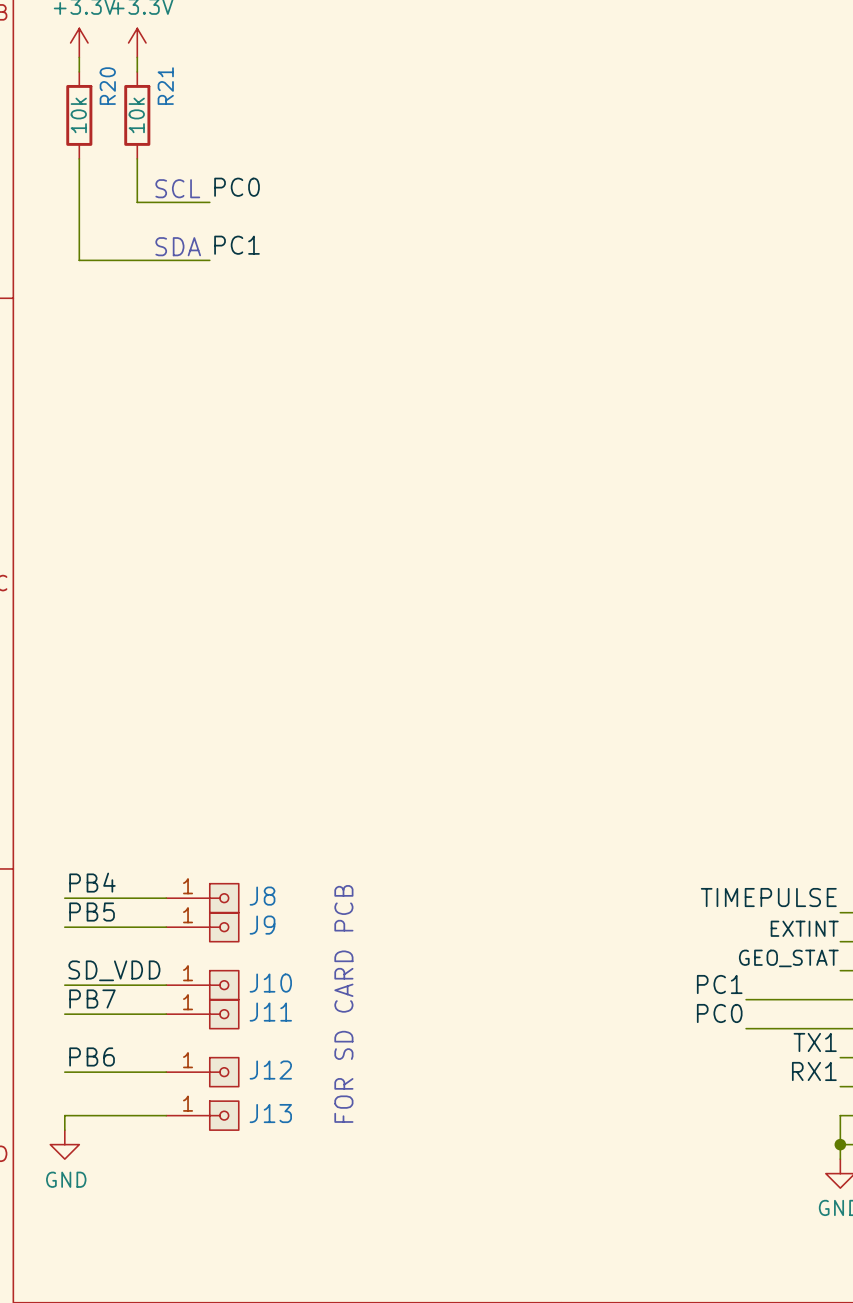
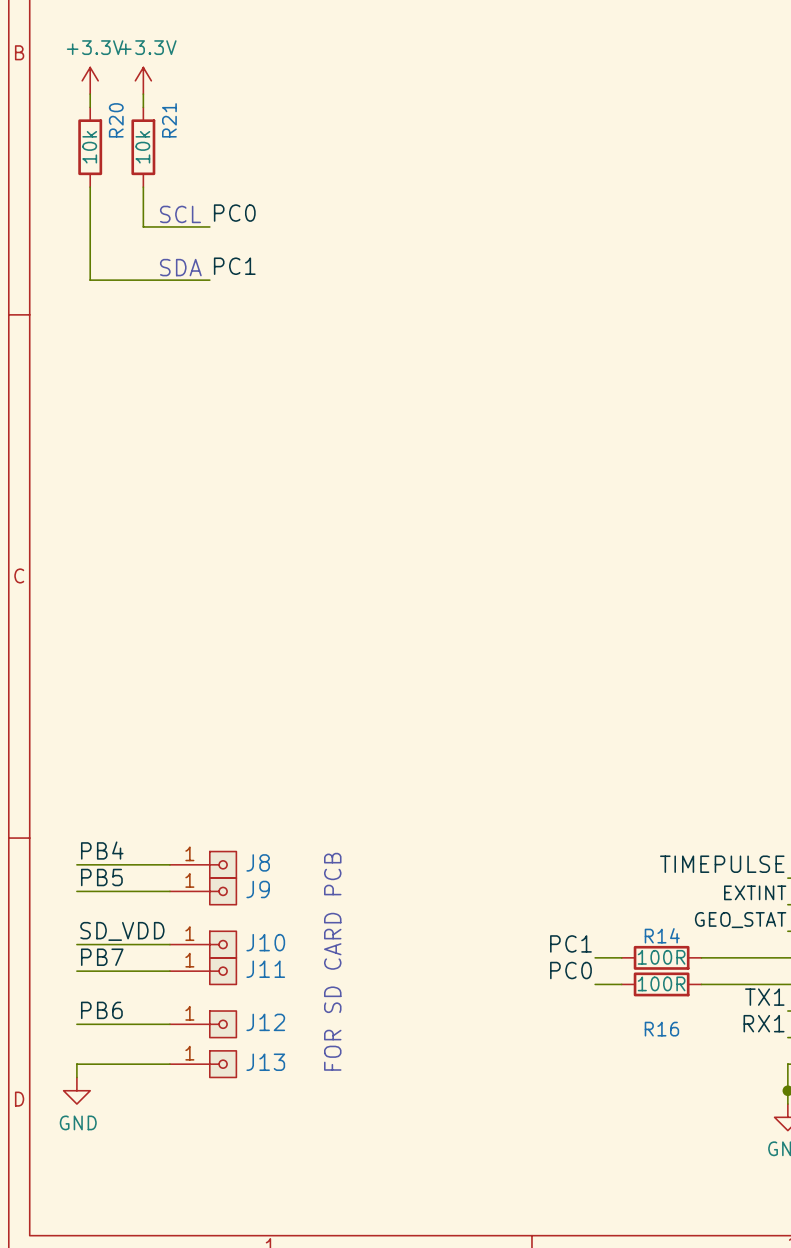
label position: PC1 (719, 984) -> PC1 (570, 943)
wire: none -> (595, 957) (621, 957)
R14: none -> 100R (661, 957)
label position: PC0 (719, 1013) -> PC0 (570, 970)
wire: none -> (595, 984) (621, 984)
R16: none -> 100R (661, 984)

